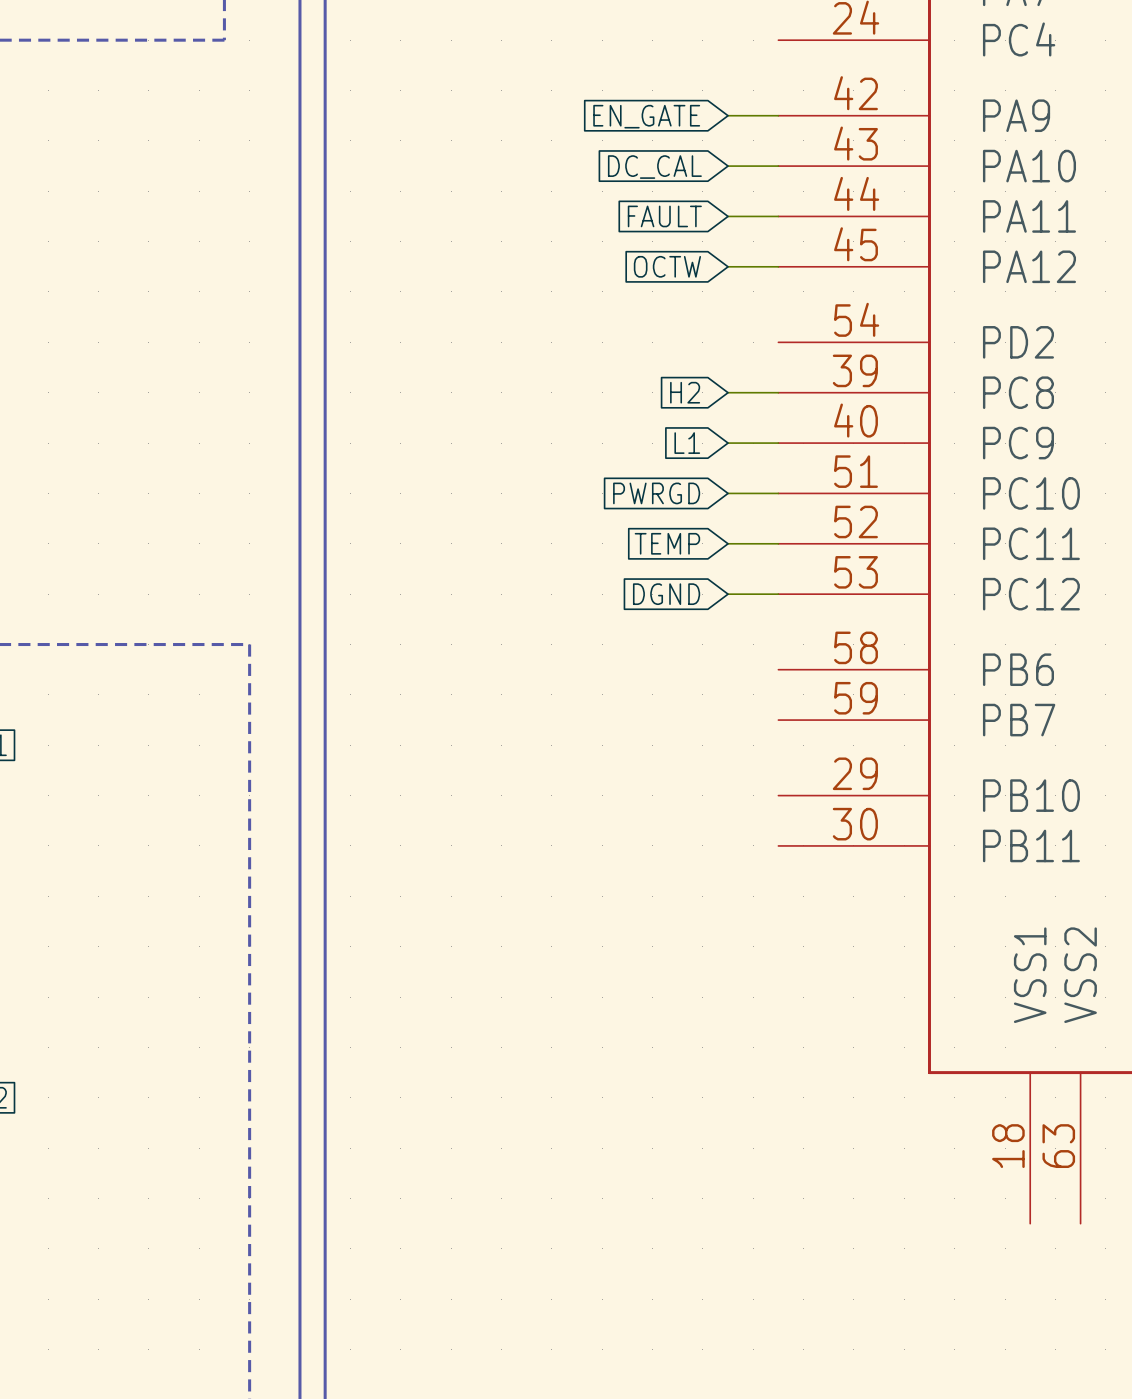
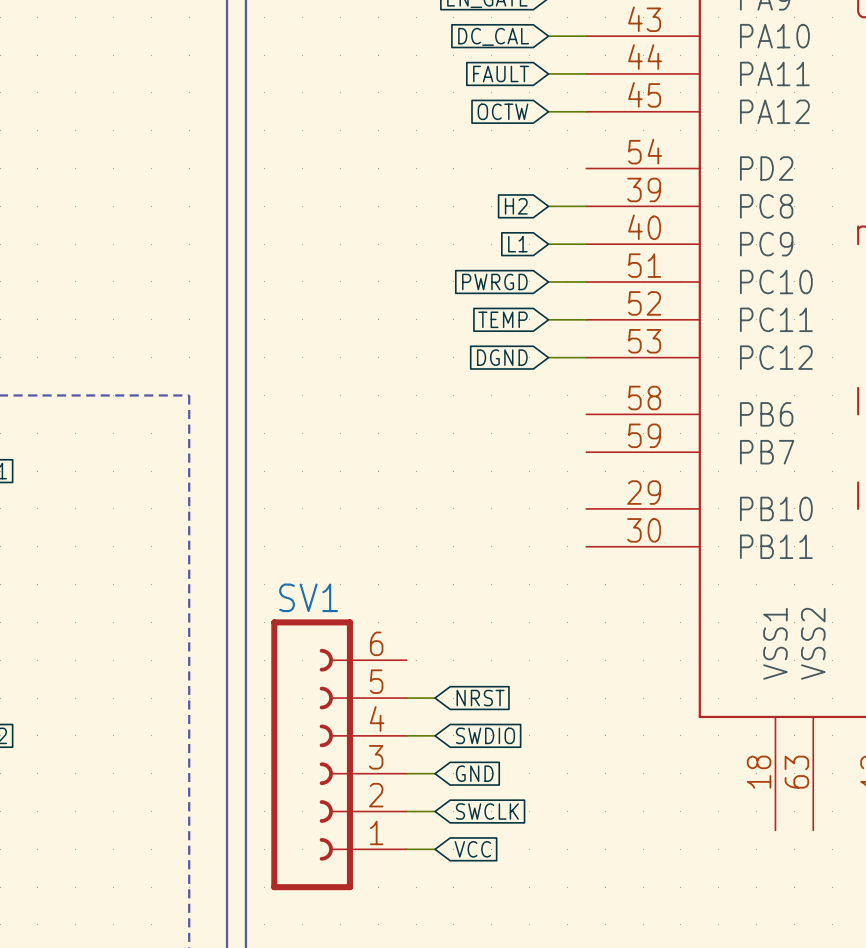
wire: none -> (406, 698) (435, 698)
global label: none -> NRST (480, 698)
wire: none -> (406, 735) (435, 735)
global label: none -> SWDIO (485, 735)
SV1: none -> (338, 754)
wire: none -> (406, 773) (435, 773)
global label: none -> GND (474, 773)
wire: none -> (406, 811) (435, 811)
global label: none -> SWCLK (487, 811)
wire: none -> (406, 849) (435, 849)
global label: none -> VCC (472, 849)

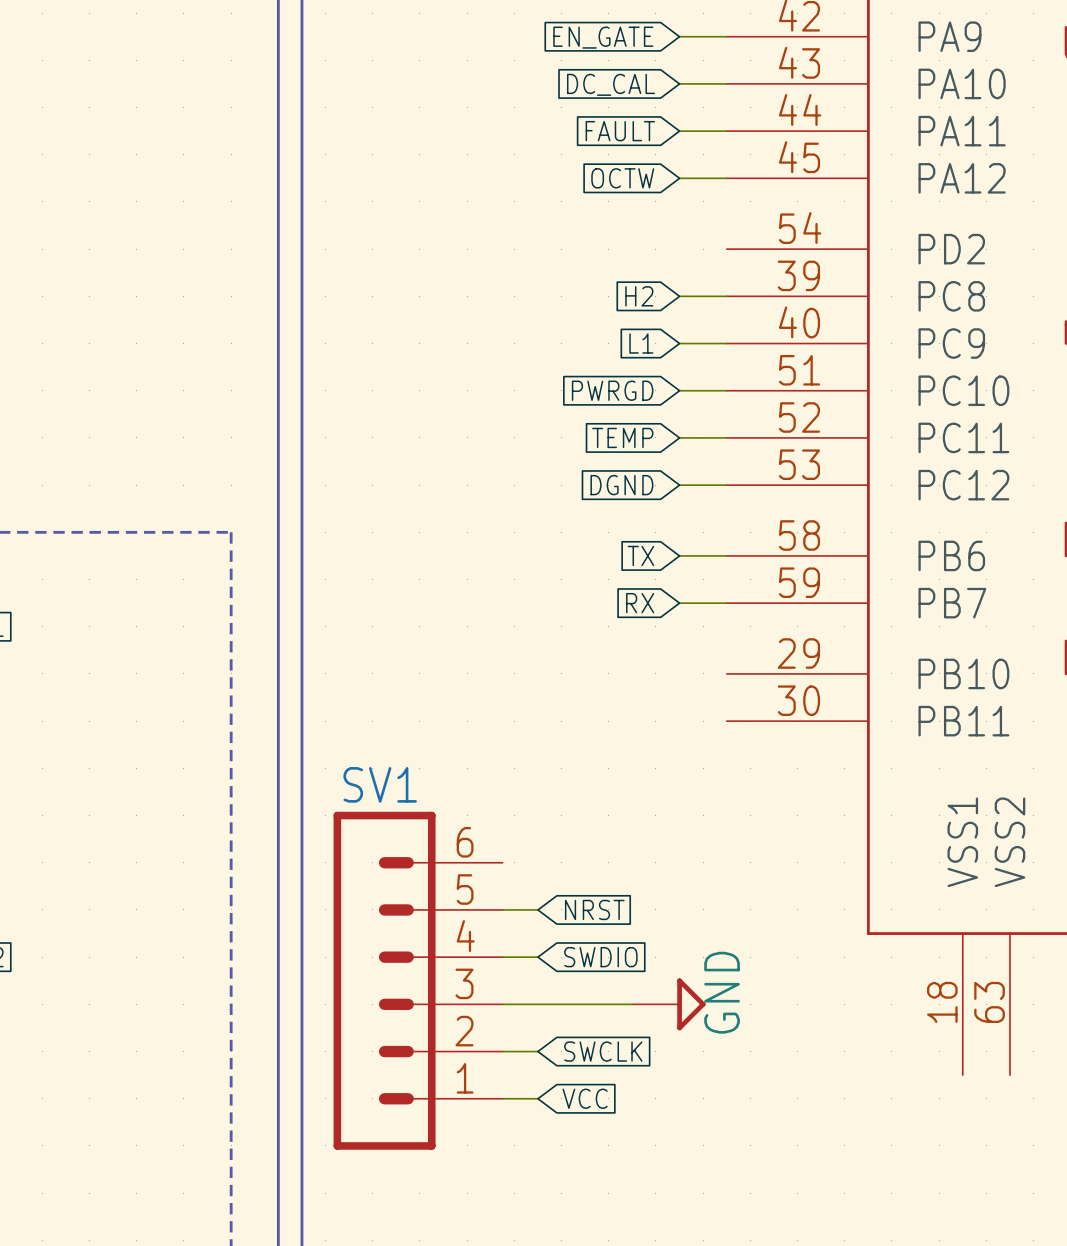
global label: none -> TX (640, 555)
wire: none -> (679, 555) (726, 555)
global label: none -> RX (640, 603)
wire: none -> (679, 603) (726, 603)
SV1 symbol: [271, 619, 407, 891] -> [333, 811, 503, 1150]
wire: none -> (537, 1004) (632, 1004)
global label: GND (474, 773) -> none
power symbol: none -> GND (668, 1004)

